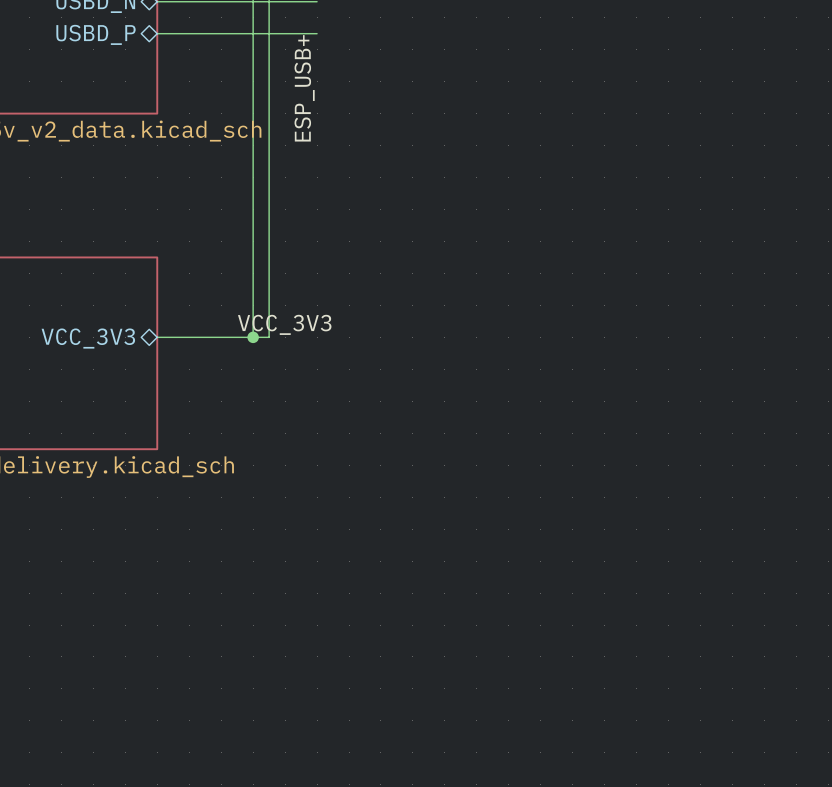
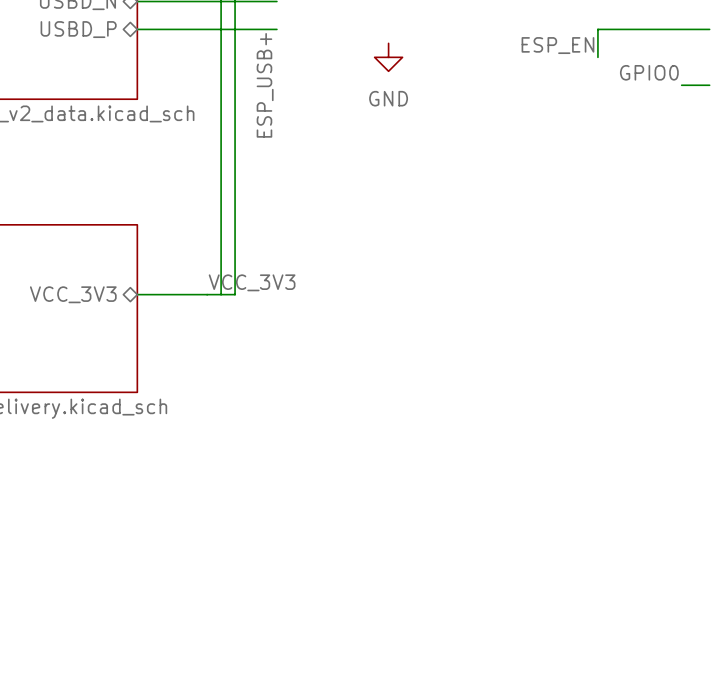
wire: none -> (709, 29) (597, 29) (597, 57)
label: none -> ESP_EN (557, 45)
power symbol: none -> GND (388, 57)
label: none -> GPIO0 (649, 72)
wire: none -> (681, 85) (709, 85)
junction: (253, 337) -> none

